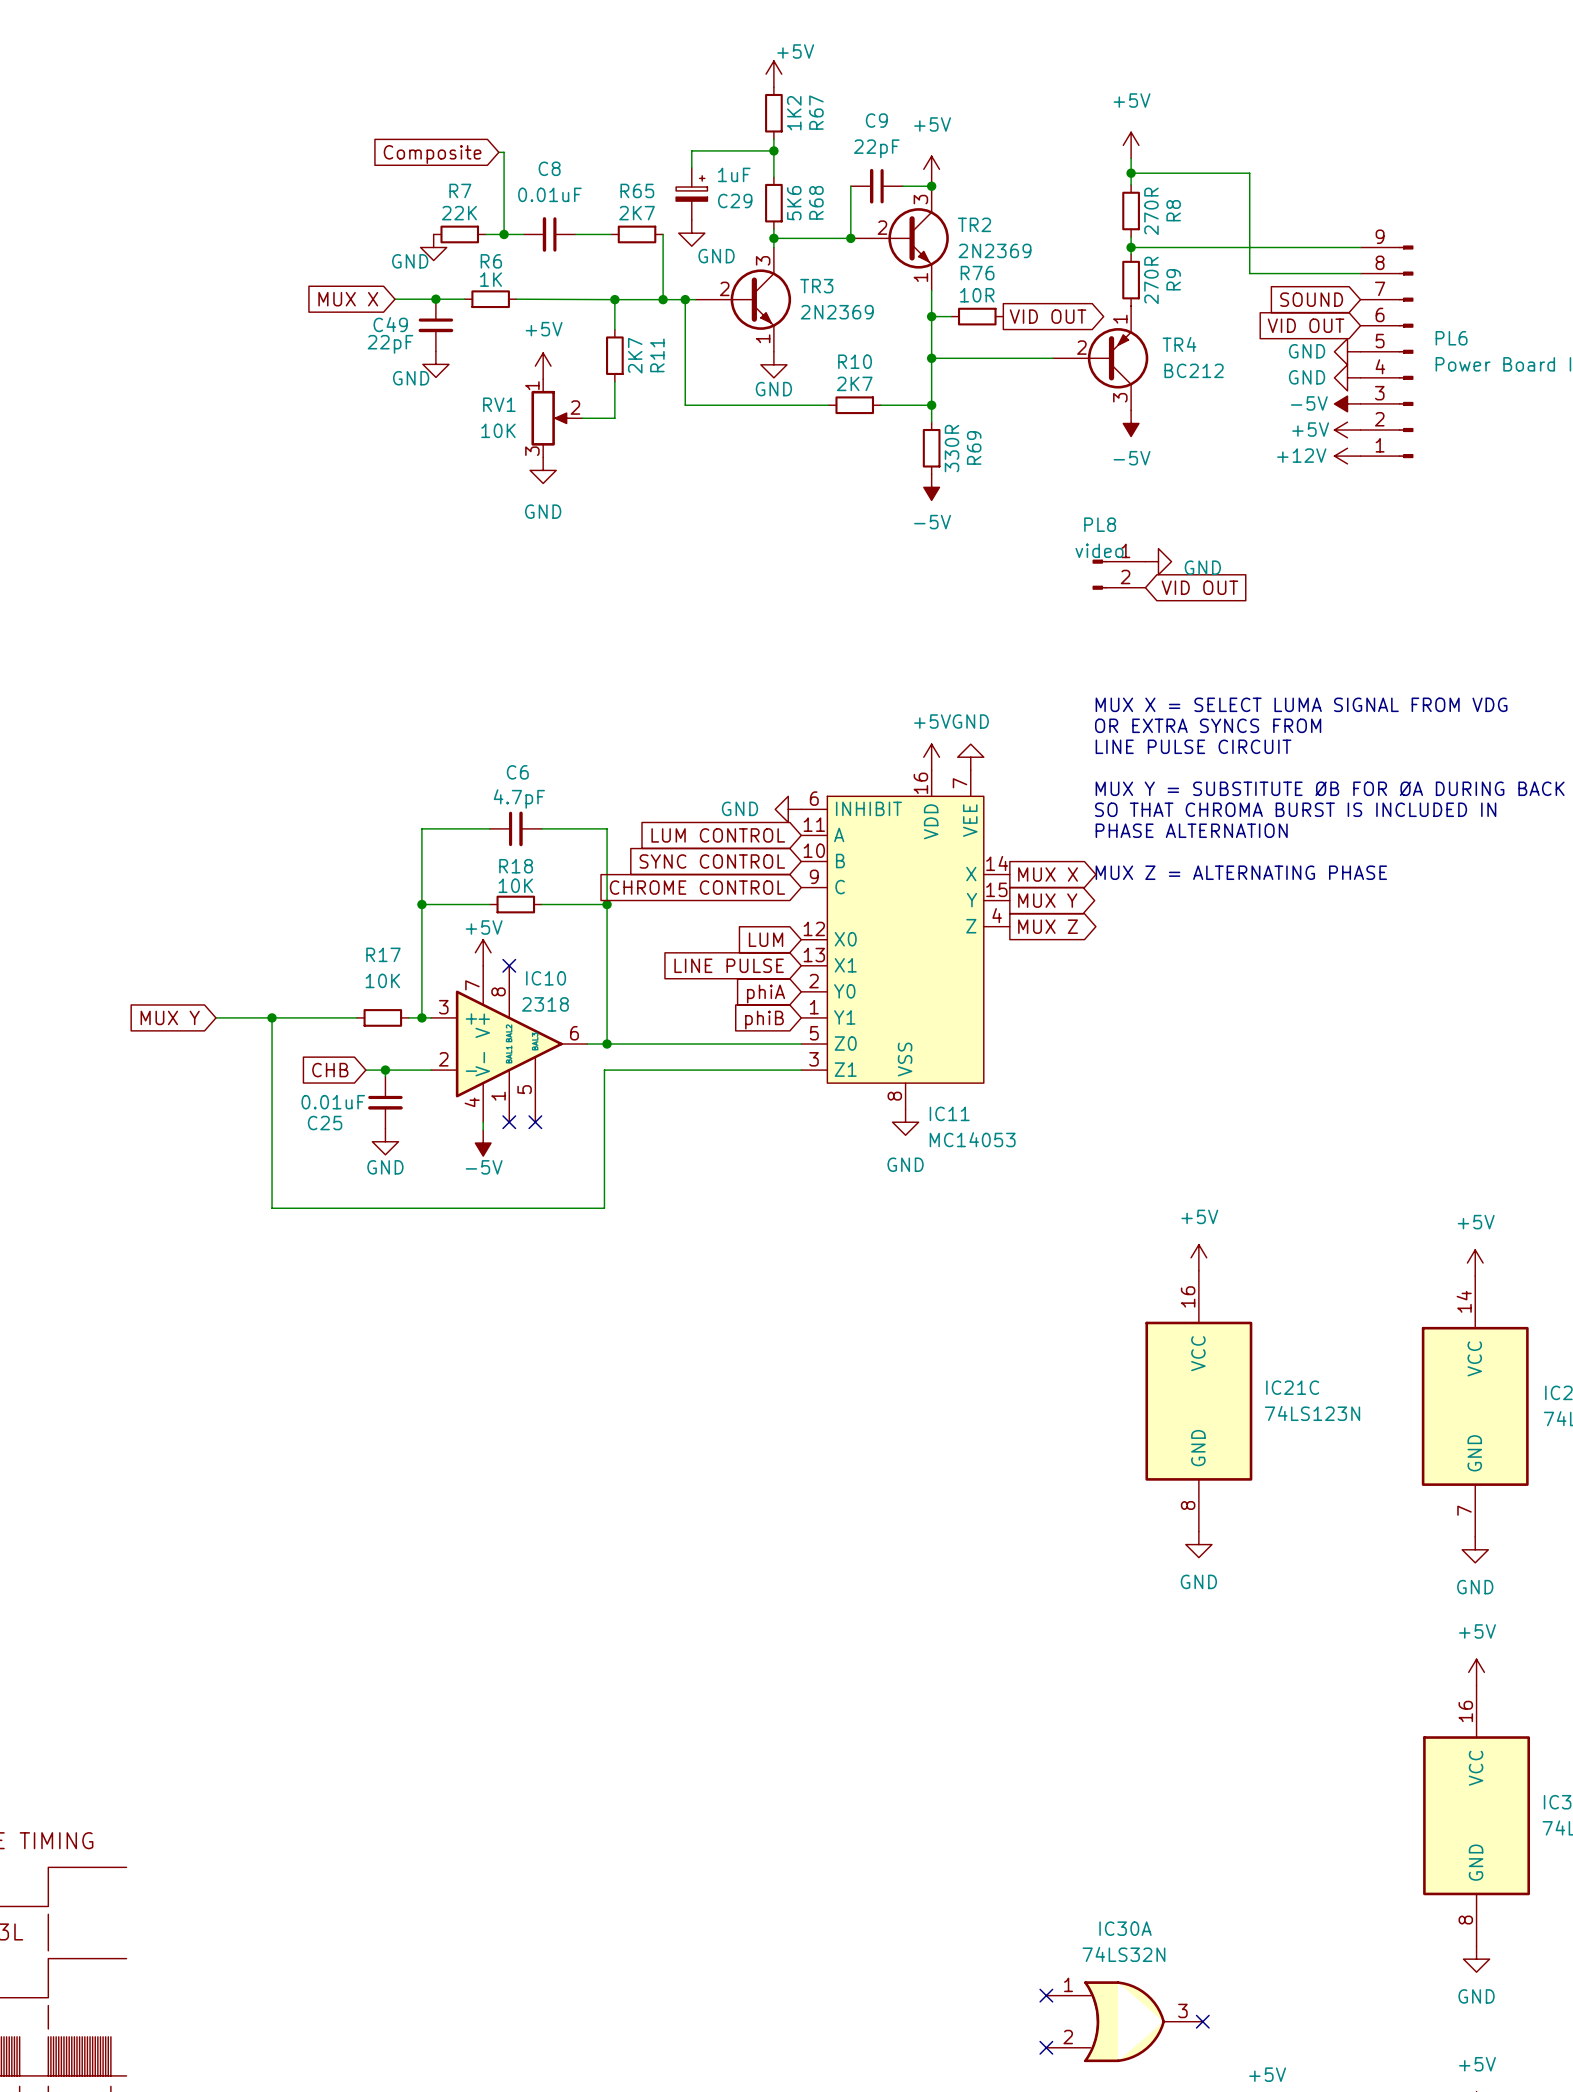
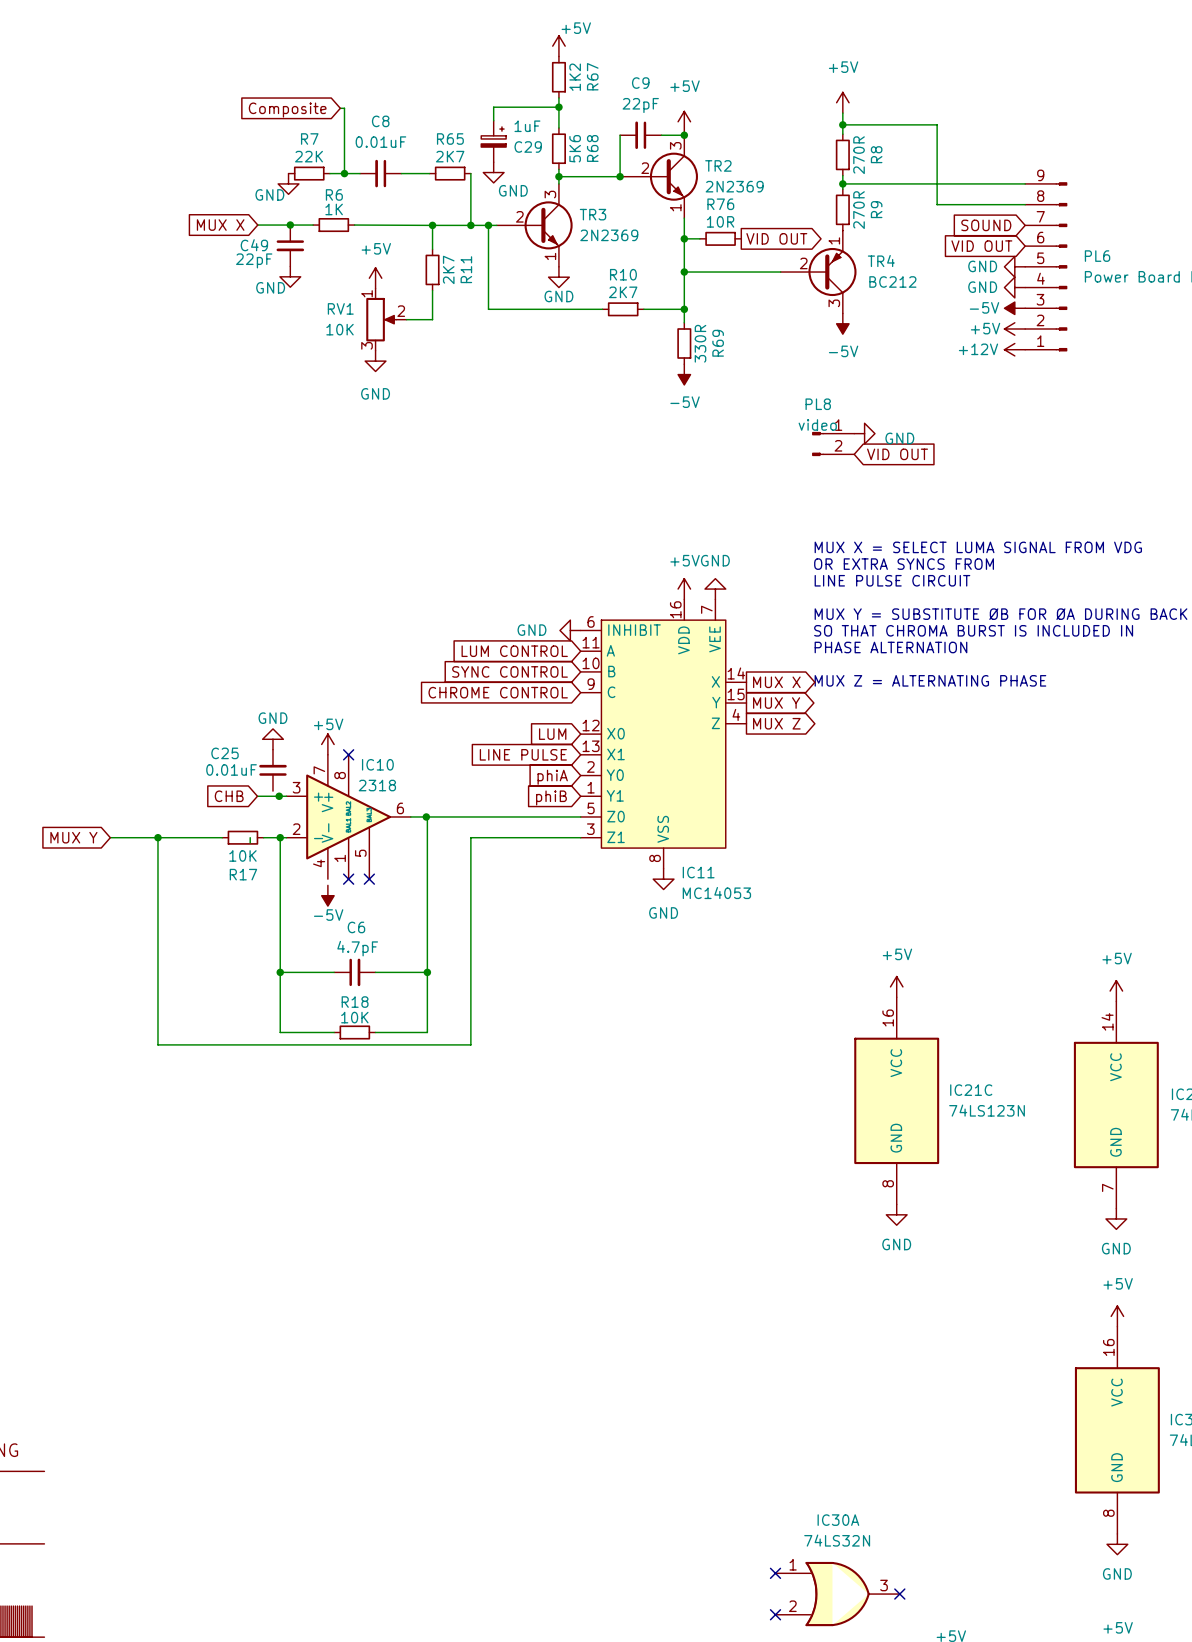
wire: (489, 828) (421, 828) (421, 1017) -> none
C6 position: (515, 828) -> (354, 972)
wire: (541, 828) (607, 828) (607, 1044) -> none
wire: (421, 904) (489, 904) -> none
junction: (421, 904) -> none
R18 position: (515, 904) -> (354, 1032)
wire: (541, 904) (607, 904) -> none
junction: (607, 904) -> none
R17 name position: R17 (383, 954) -> R17 (243, 874)
R17 value position: 10K (382, 980) -> 10K (242, 855)
global label position: MUX Y (170, 1017) -> MUX Y (73, 837)
wire: (215, 1017) (356, 1017) -> (110, 837) (222, 837)
wire: (272, 1017) (272, 1208) (604, 1208) (604, 1070) (663, 1070) -> (157, 837) (157, 1044) (470, 1044) (470, 837)
junction position: (272, 1017) -> (157, 837)
R17 position: (382, 1017) -> (242, 837)
wire: none -> (427, 816) (427, 1032) (375, 1032)
global label position: CHB (330, 1070) -> CHB (229, 796)
wire: (365, 1070) (402, 1070) -> none
junction position: (385, 1070) -> (280, 837)
wire: none -> (280, 837) (280, 1032) (334, 1032)
C25 rotation: 0° (385, 1102) -> 180° (272, 770)
C25 position: (385, 1102) -> (272, 770)
wire: (483, 1122) (483, 1130) -> none
C25 name position: C25 (325, 1123) -> C25 (225, 753)
power symbol rotation: 0° (385, 1141) -> 180° (272, 739)
power symbol position: GND (385, 1141) -> GND (272, 739)
wire: none -> (280, 972) (334, 972)
junction: none -> (280, 972)
wire: none -> (375, 972) (427, 972)
junction: none -> (427, 972)

